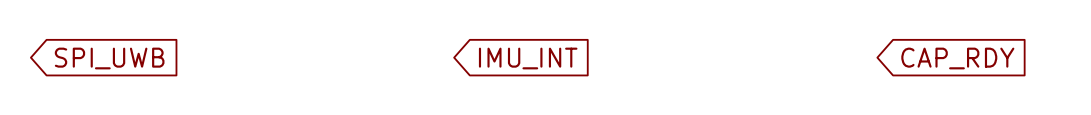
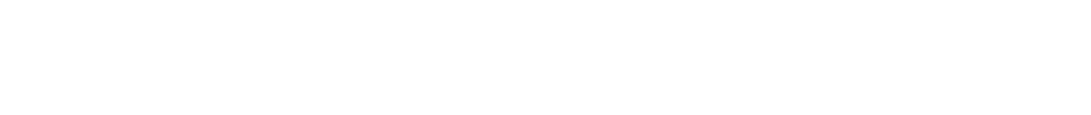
global label: SPI_UWB (109, 58) -> none
global label: IMU_INT (528, 58) -> none
global label: CAP_RDY (957, 58) -> none

